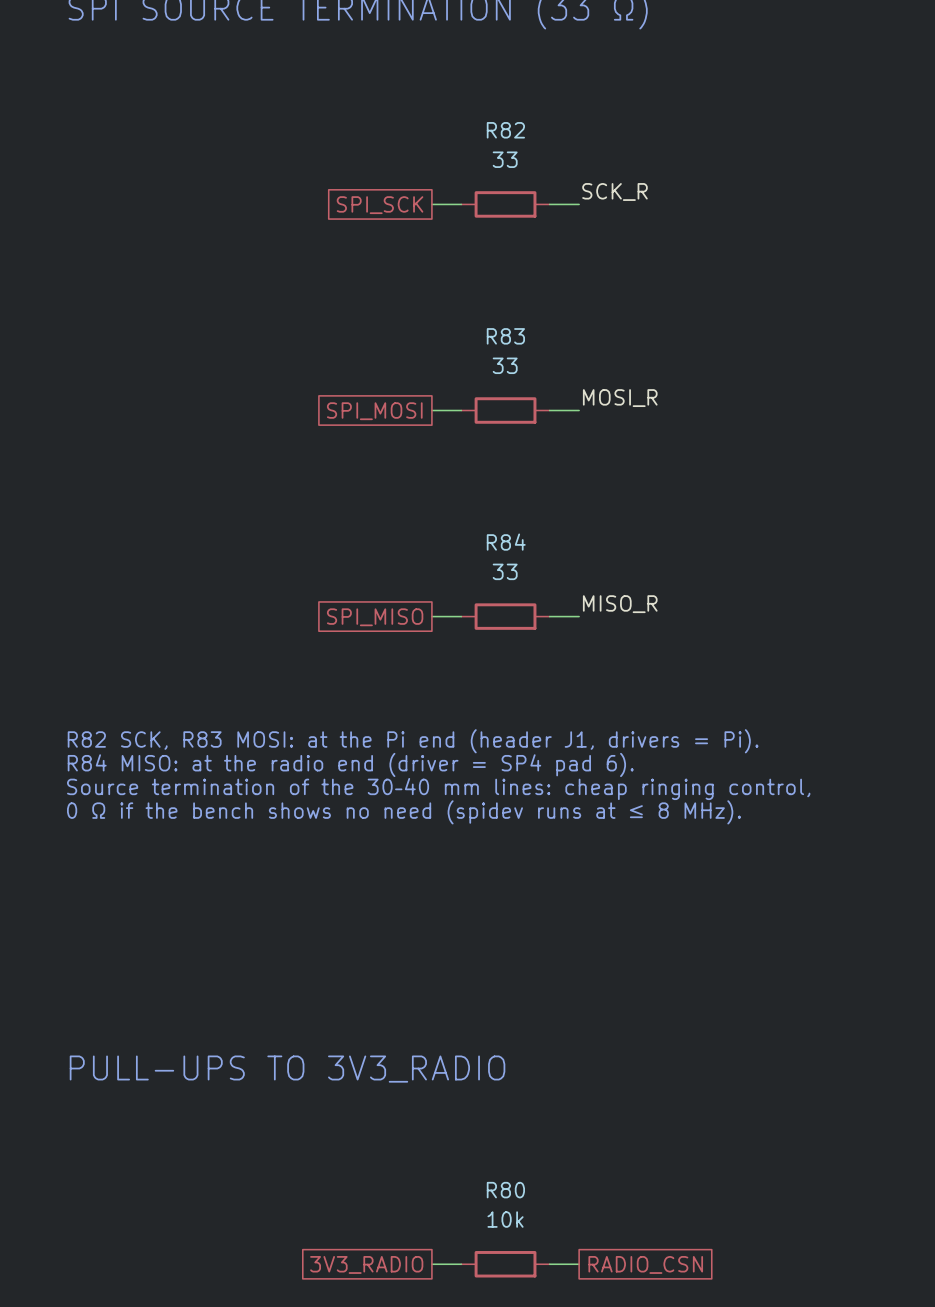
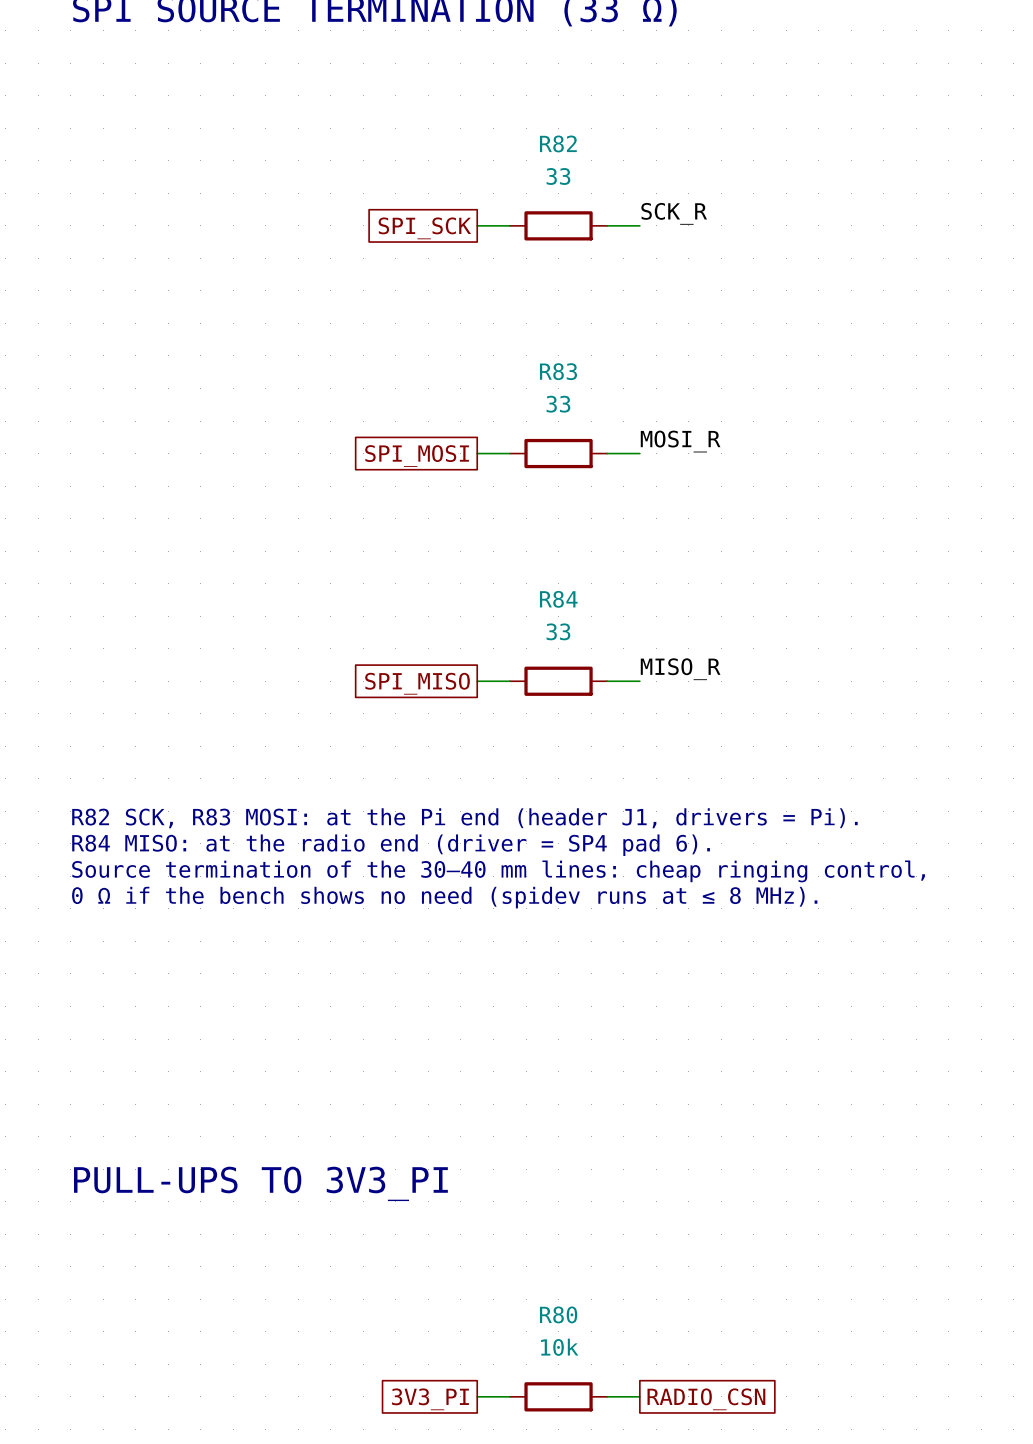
text: PULL-UPS TO 3V3_RADIO (287, 1069) -> PULL-UPS TO 3V3_PI (260, 1183)
global label: 3V3_RADIO (366, 1264) -> 3V3_PI (430, 1399)

